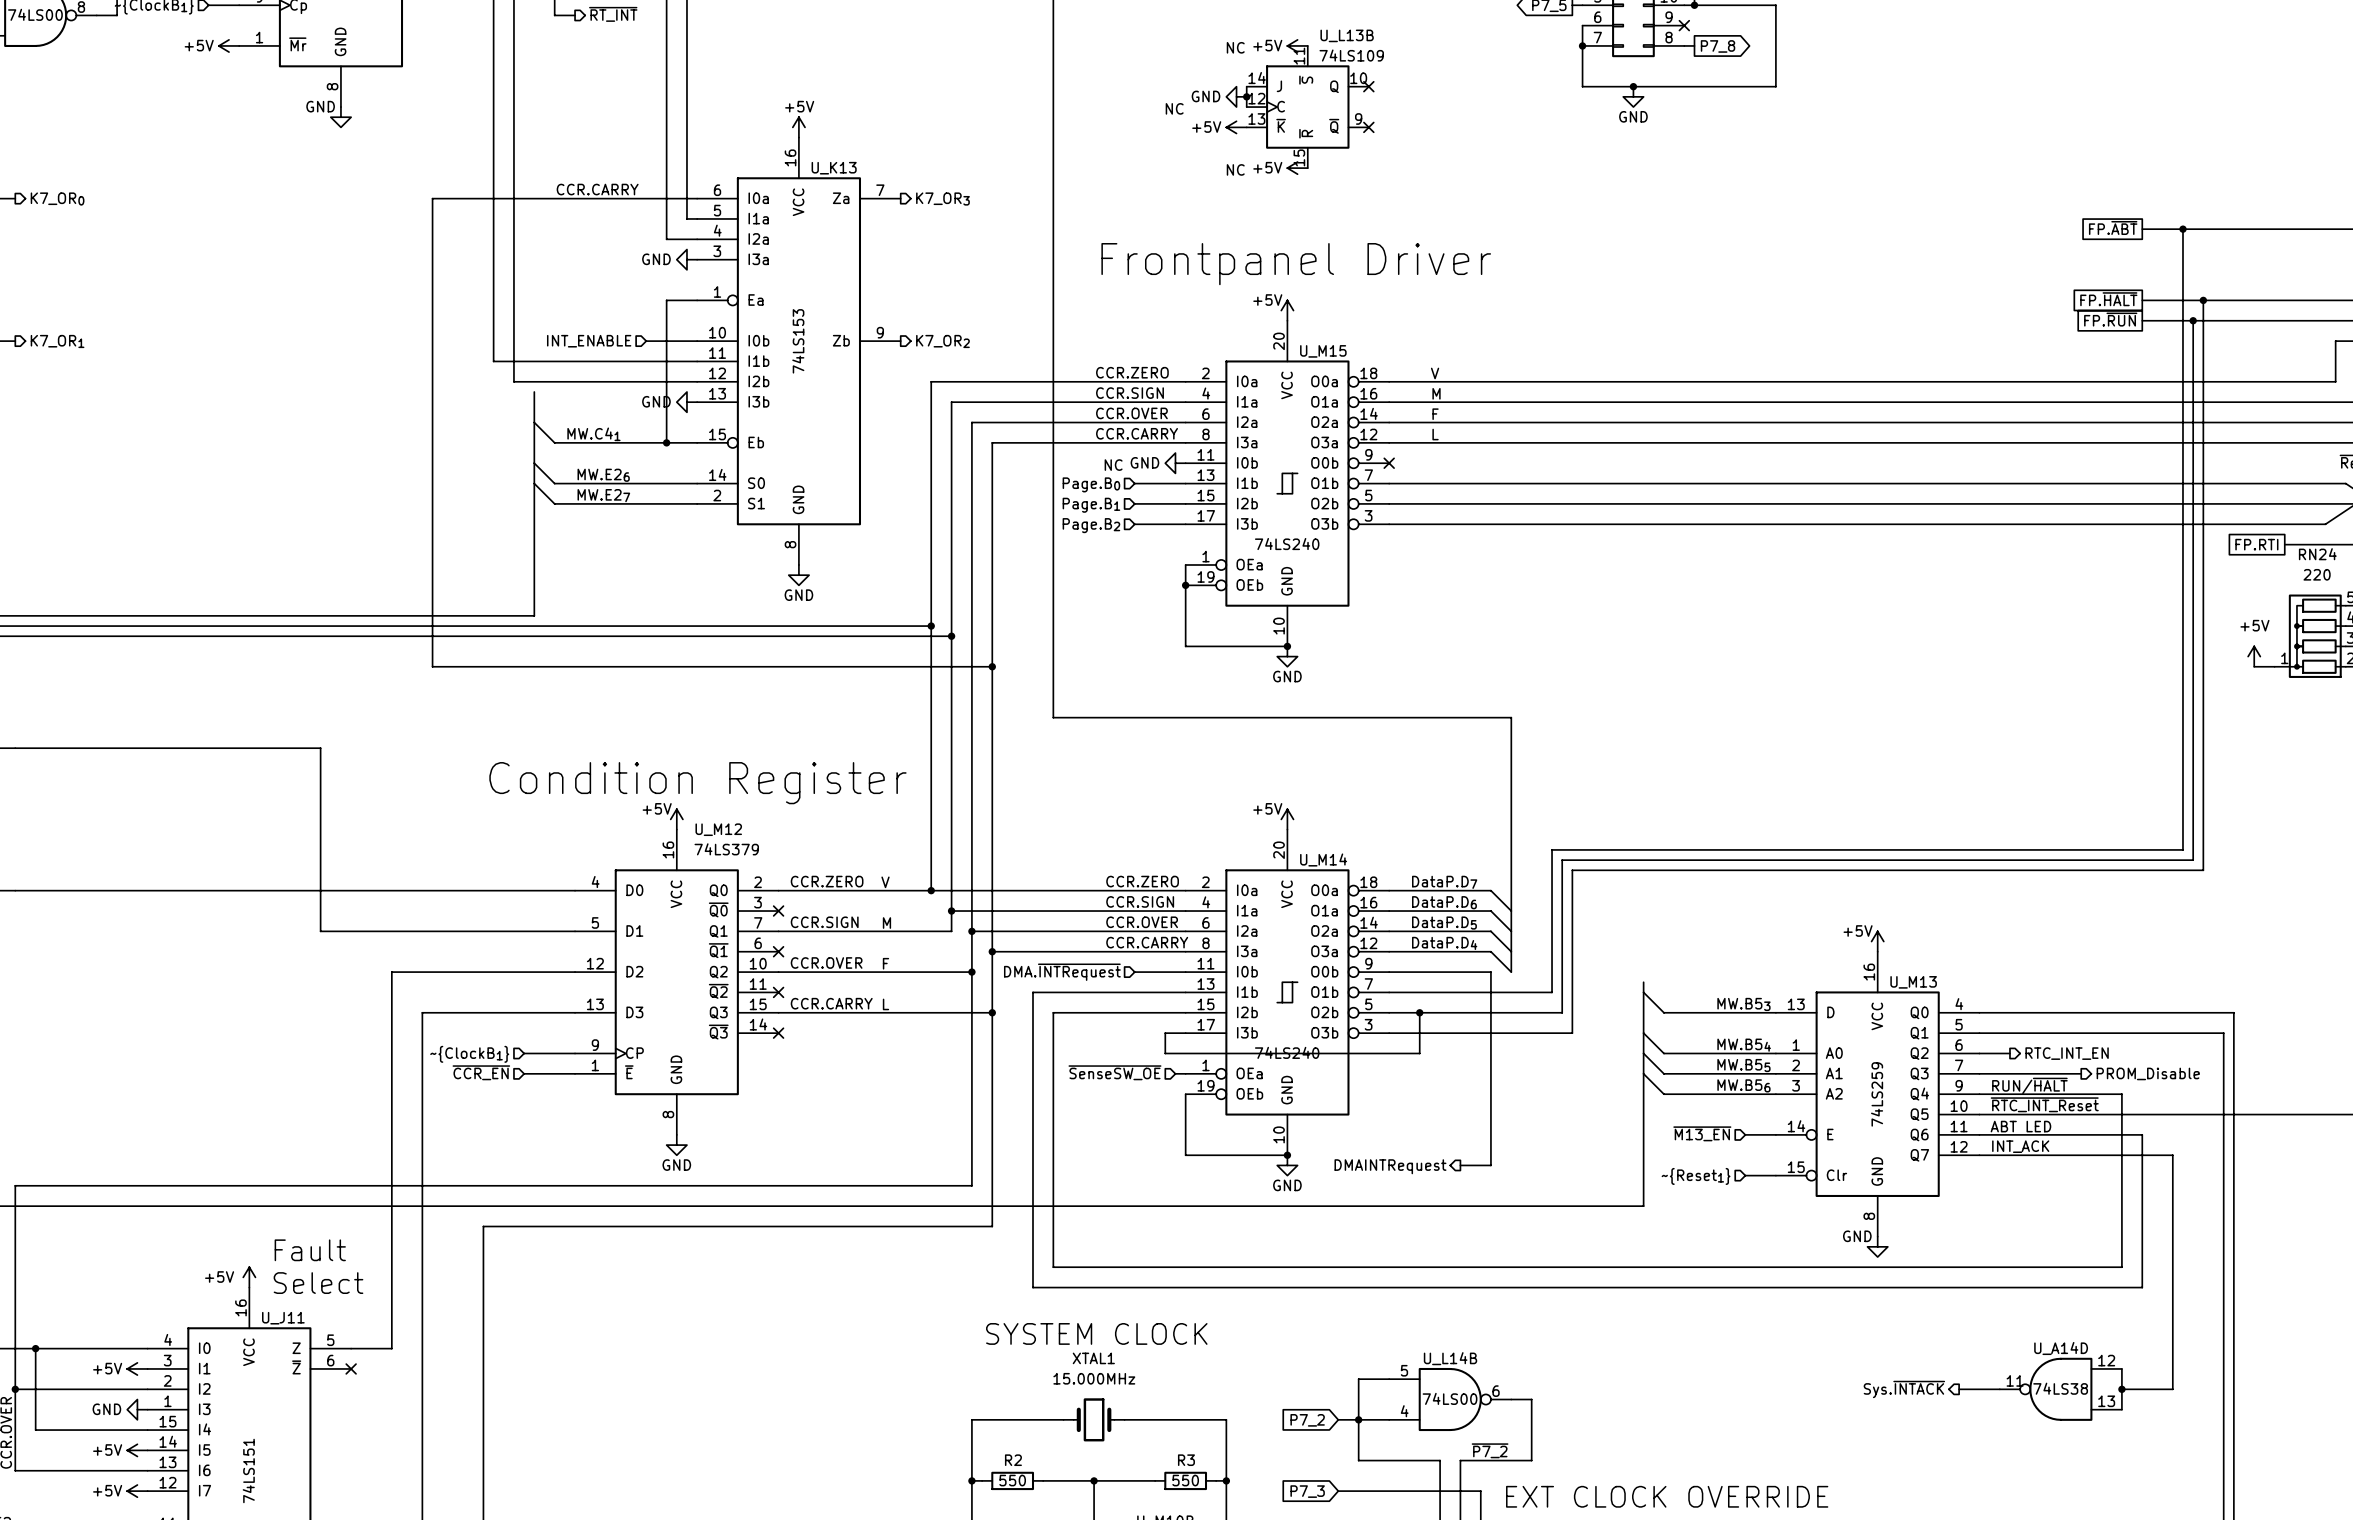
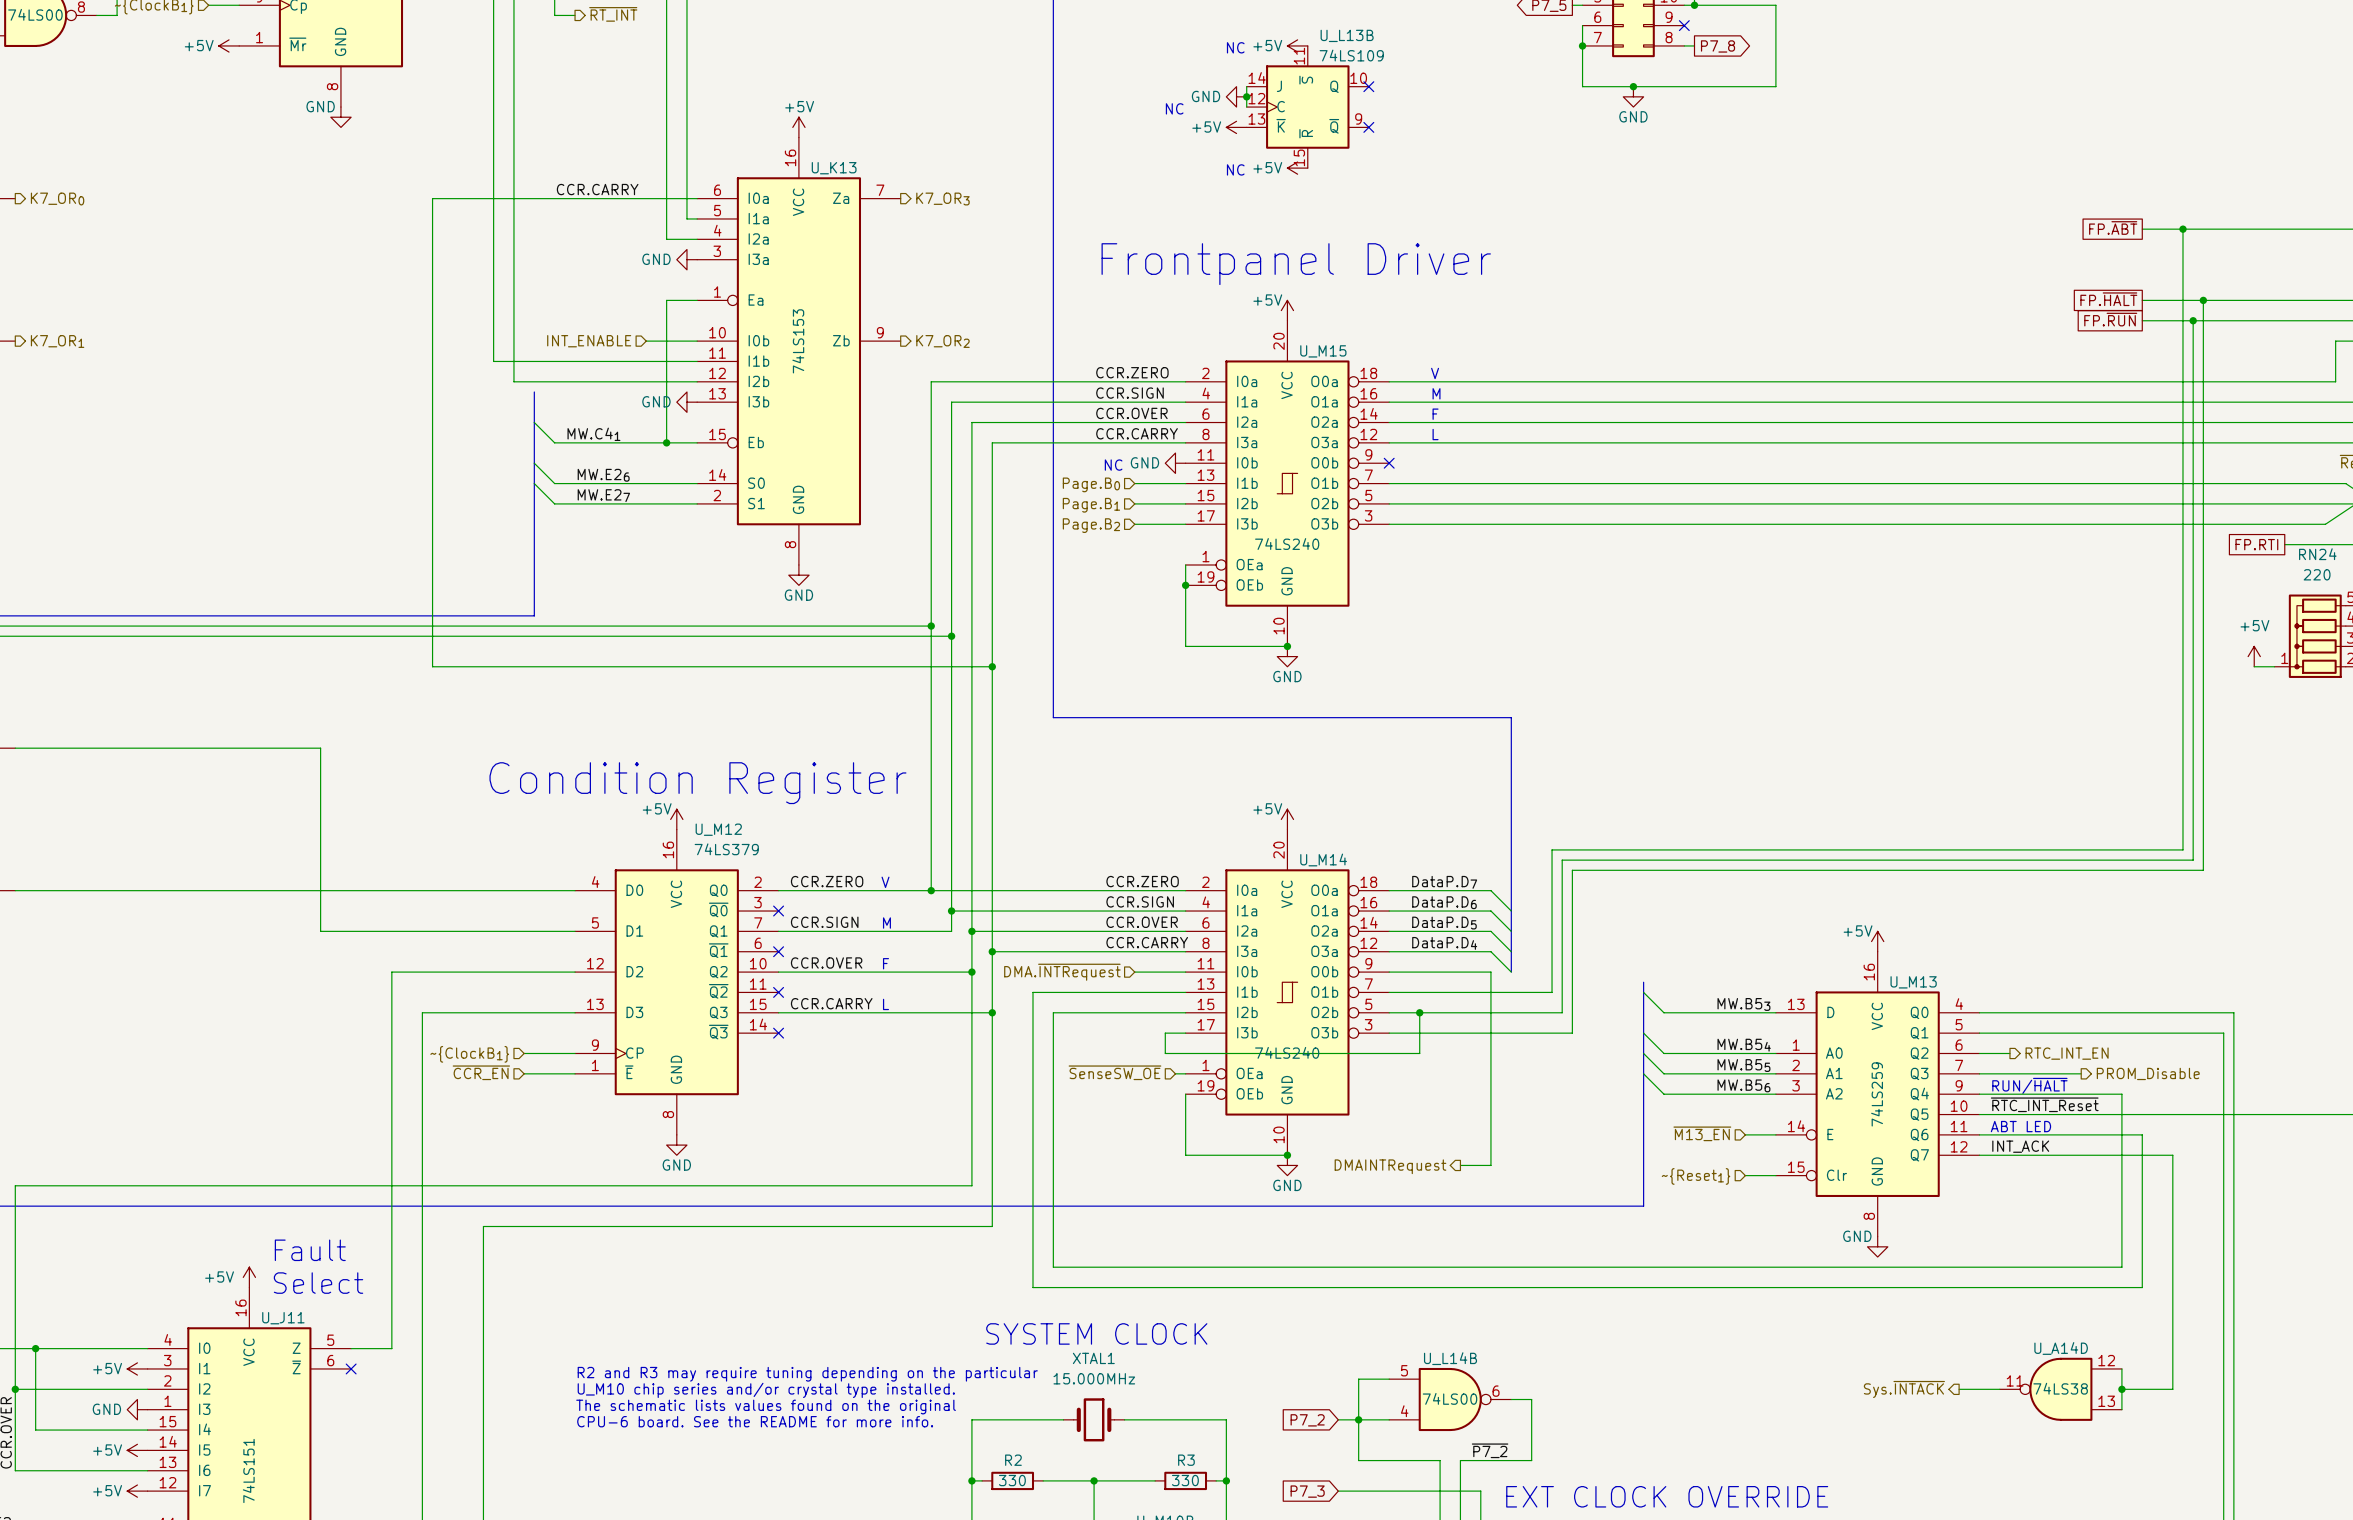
text: none -> R2 and R3 may require tuning depending on the particular (807, 1374)
text: none -> U_M10 chip series and/or crystal type installed. (766, 1390)
text: none -> The schematic lists values found on the original (766, 1407)
text: none -> CPU-6 board. See the README for more info. (755, 1421)
R2 value: 550 (1012, 1480) -> 330 (1012, 1480)
R3 value: 550 (1185, 1480) -> 330 (1185, 1480)

